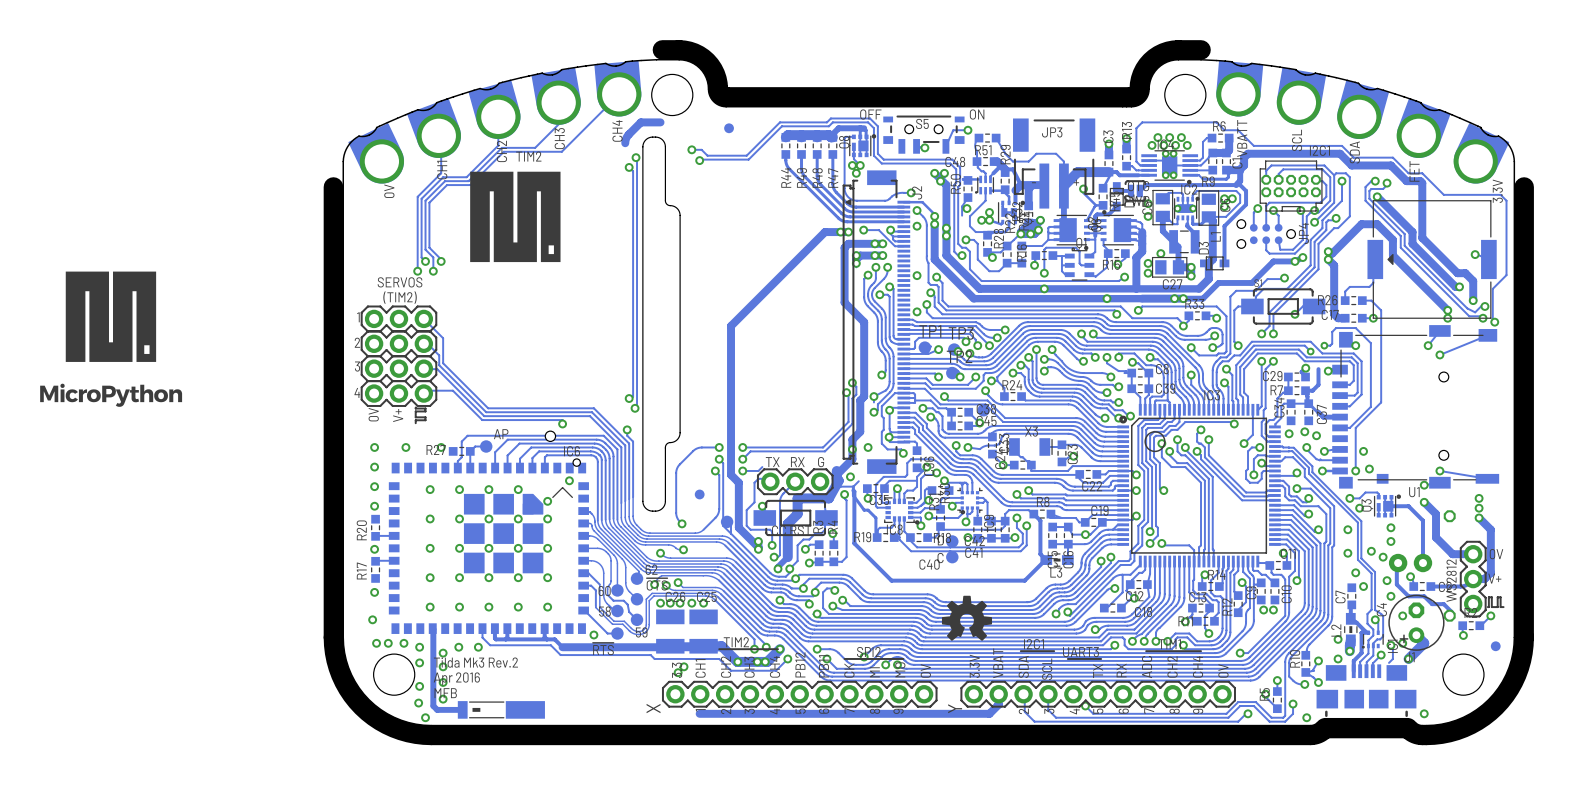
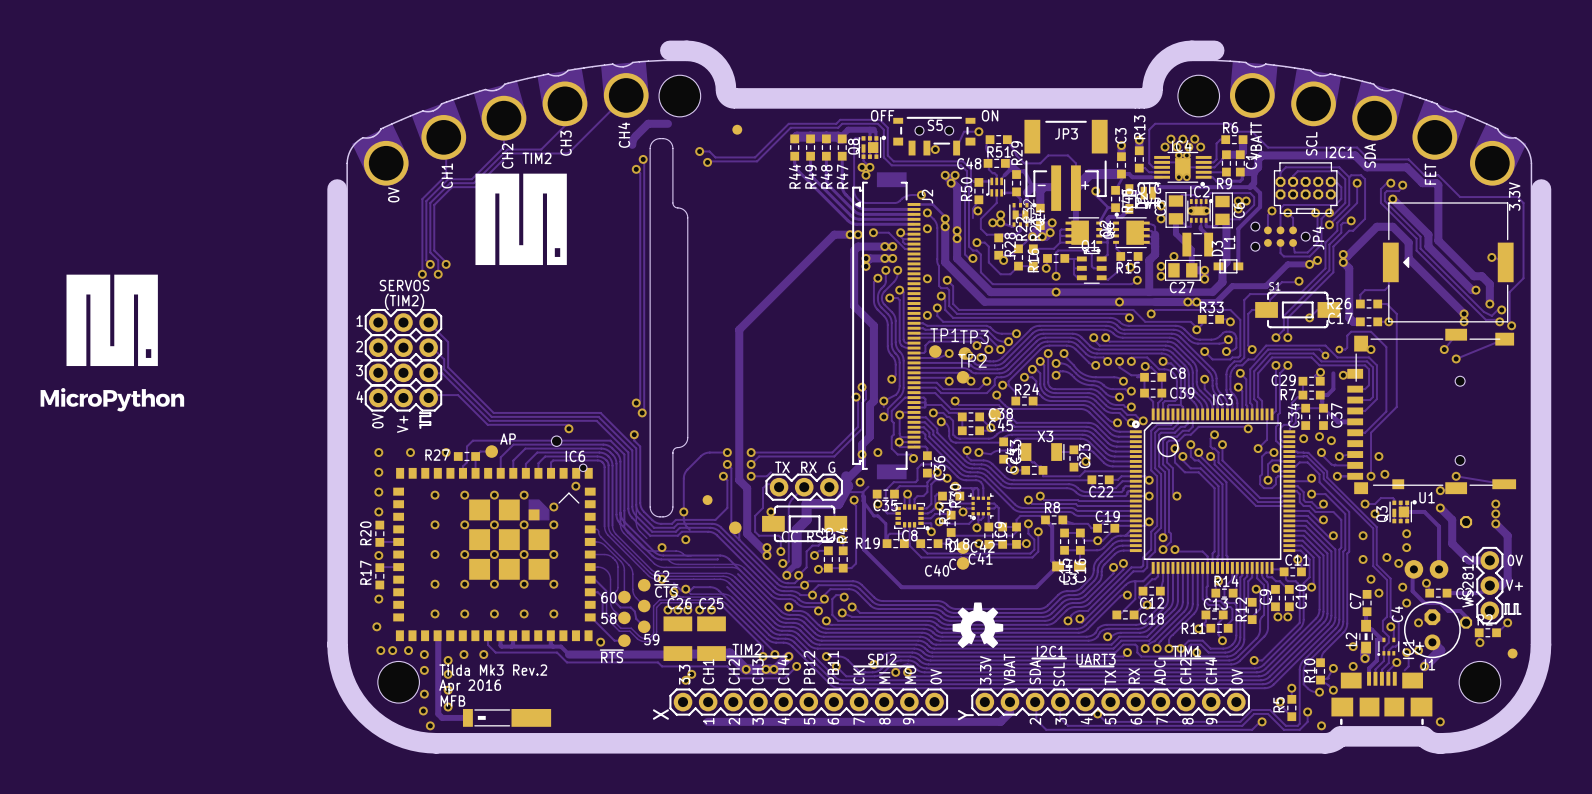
track: (633, 497) (634, 521) (642, 530) (649, 533) (699, 532) (717, 515) (719, 502) -> (640, 502) (642, 510) (652, 520) (661, 523) (671, 523) (675, 519) (715, 519) (727, 507)
track: (625, 501) (626, 521) (642, 538) (719, 539) (728, 542) -> (632, 506) (634, 514) (652, 531) (675, 531) (679, 527) (713, 528) (736, 548)
track: (621, 503) (623, 523) (640, 541) (716, 541) (725, 545) -> (628, 508) (630, 516) (650, 535) (677, 535) (681, 531) (709, 531) (715, 534) (733, 551)
track: none -> (620, 512) (624, 521) (658, 554) (723, 555) (740, 571)
via: none -> (683, 511)
track: (609, 508) (609, 520) (612, 526) (649, 563) (720, 564) (729, 567) -> (616, 514) (620, 523) (656, 558) (717, 559)
track: (583, 511) (591, 514) (597, 529) (638, 571) (637, 578) -> none
via: (682, 523) -> none
track: (639, 532) (648, 536) (724, 536) (731, 539) -> (636, 504) (638, 512) (654, 527) (673, 527) (677, 523) (715, 524) (739, 545)
via: none -> (685, 539)
via: none -> (662, 547)
via: (683, 549) -> none
via: (660, 553) -> none
via: none -> (662, 579)
track: (718, 580) (706, 575) (661, 575) (654, 584) -> none
via: (654, 584) -> none
track: (712, 590) (720, 594) -> (673, 583) (681, 591) (689, 591) (693, 587) (713, 587) (729, 600)

